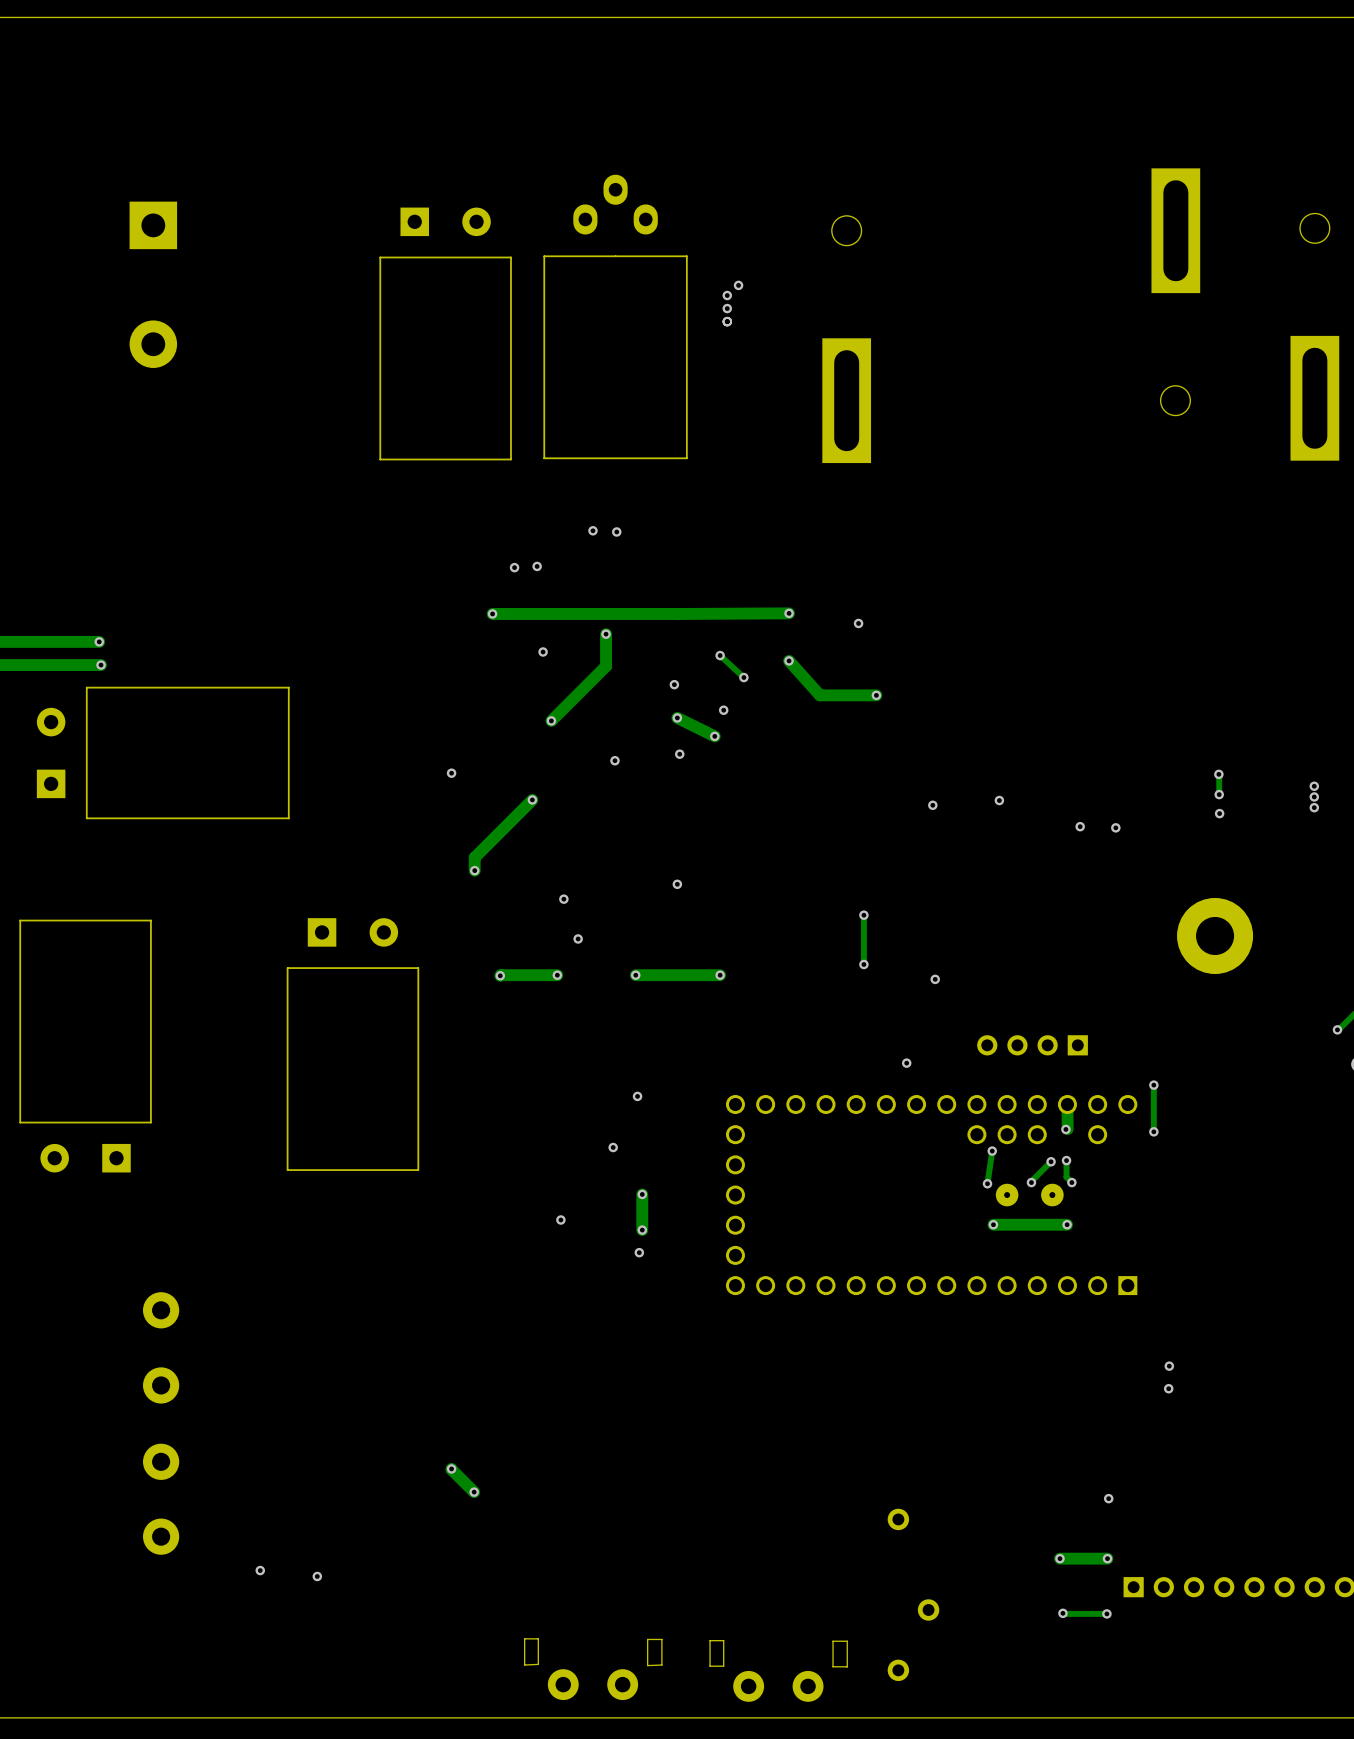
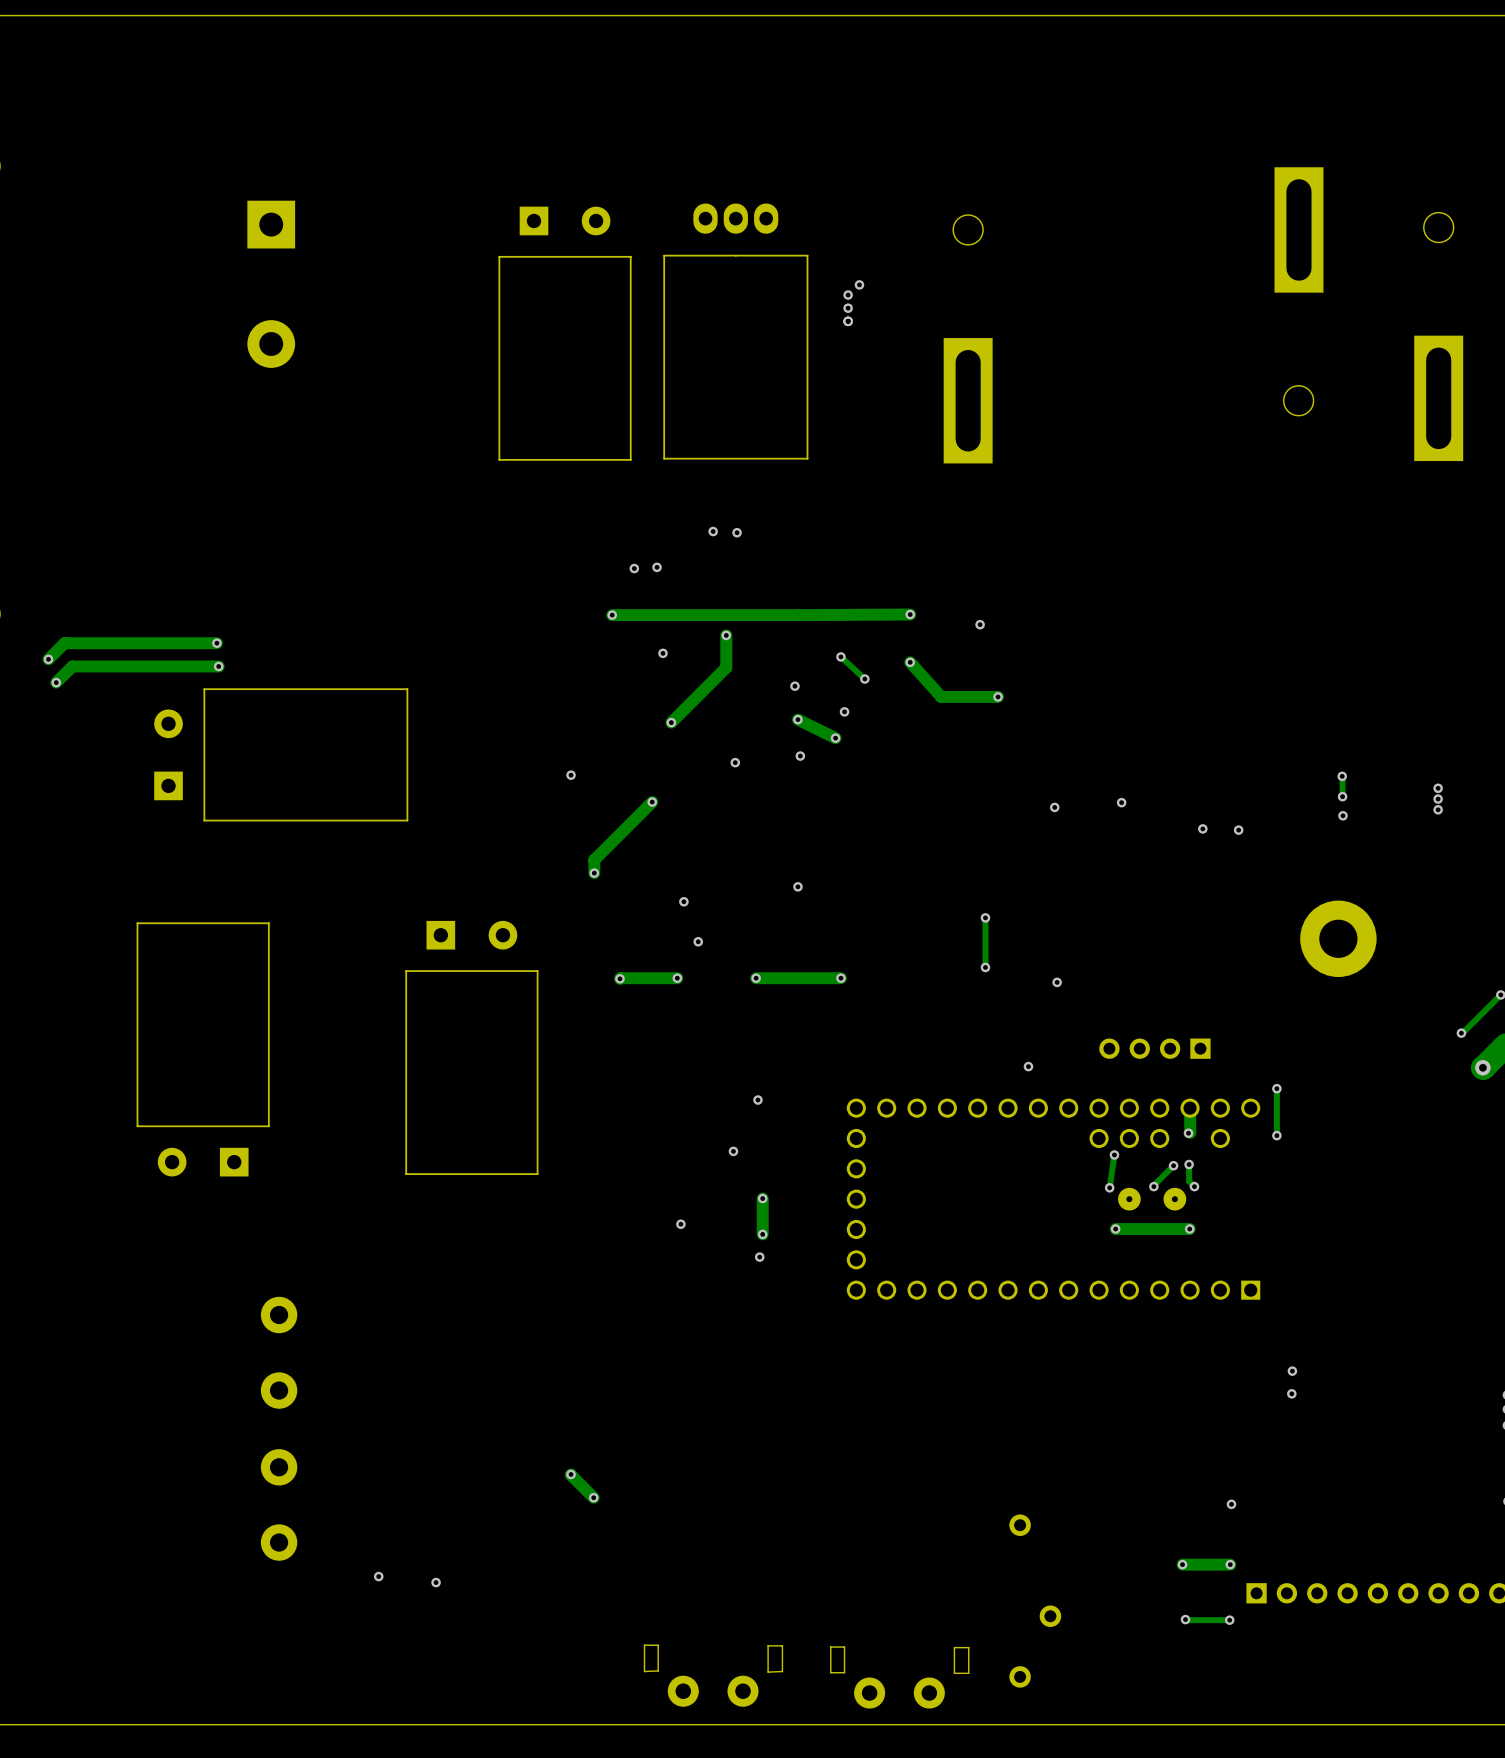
part: (615, 316) -> none
part: none -> (735, 331)

